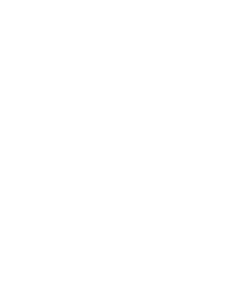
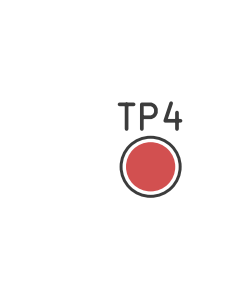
TP4: none -> (150, 166)

